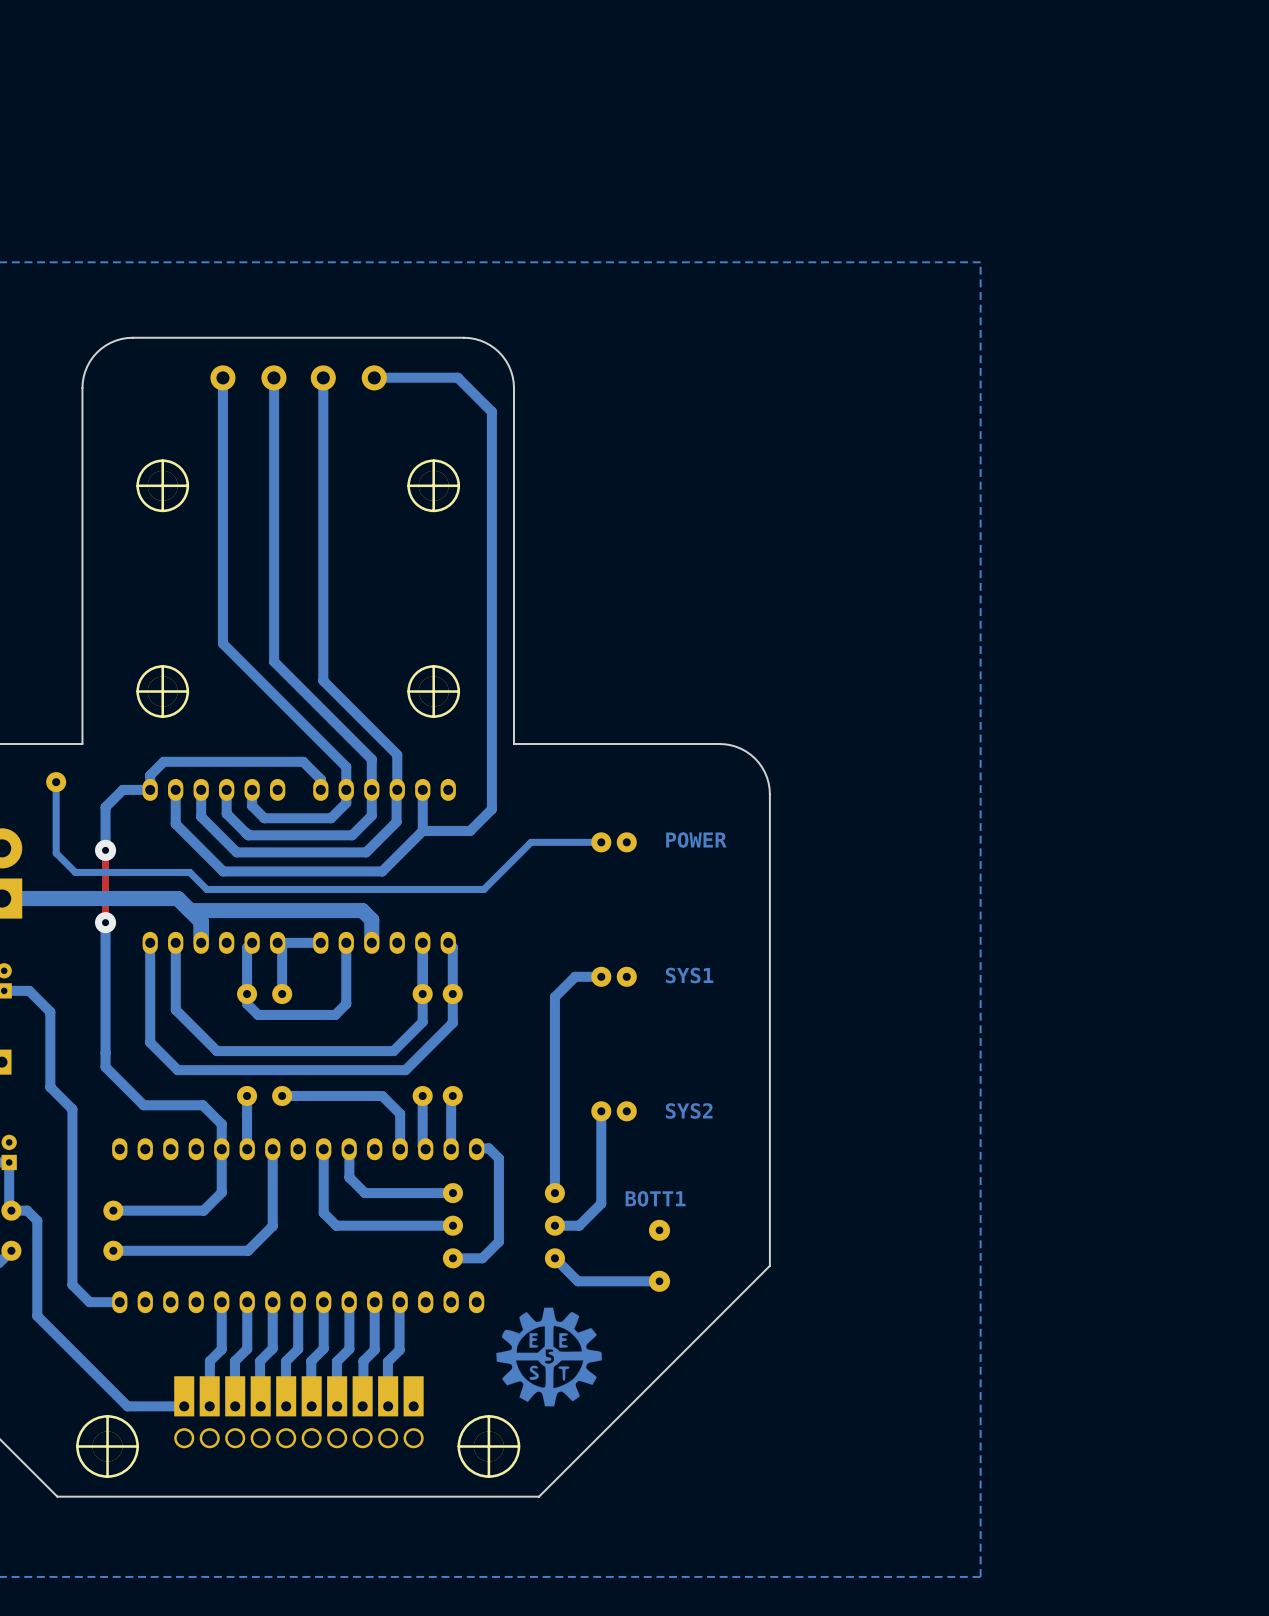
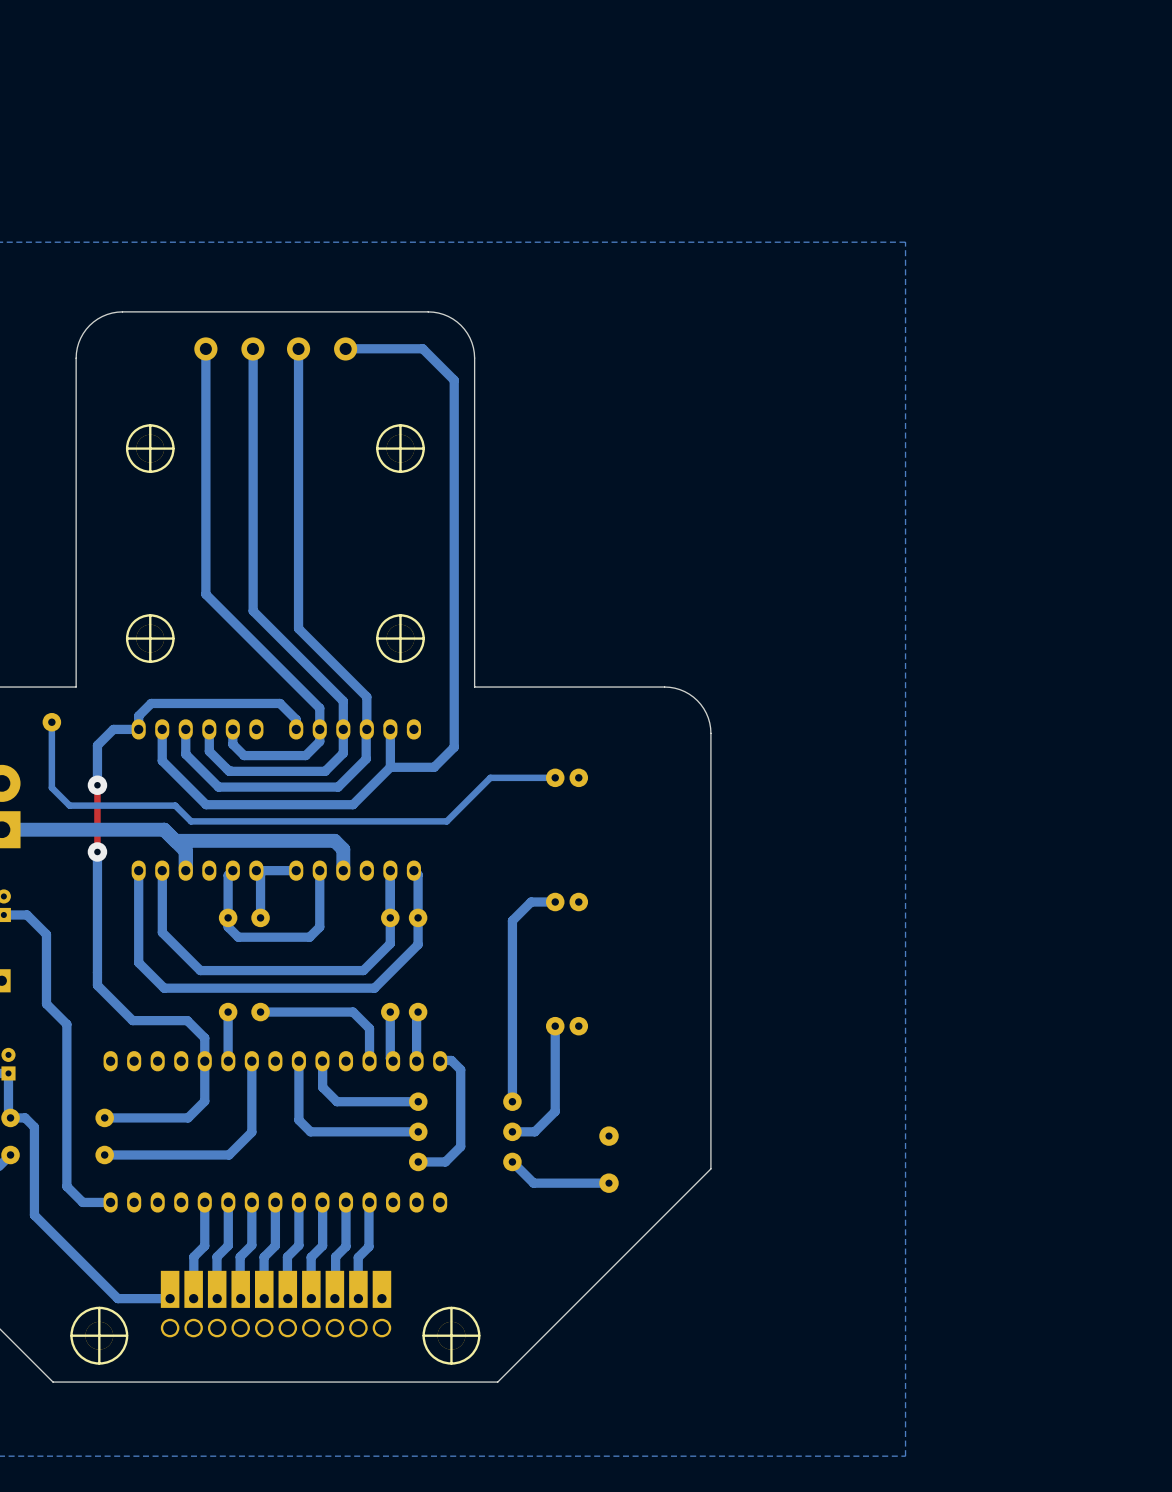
text: POWER (696, 840) -> none
text: SYS1 (689, 975) -> none
text: SYS2 (689, 1110) -> none
text: BOTT1 (655, 1198) -> none
drawing: [496, 1307, 602, 1407] -> none

